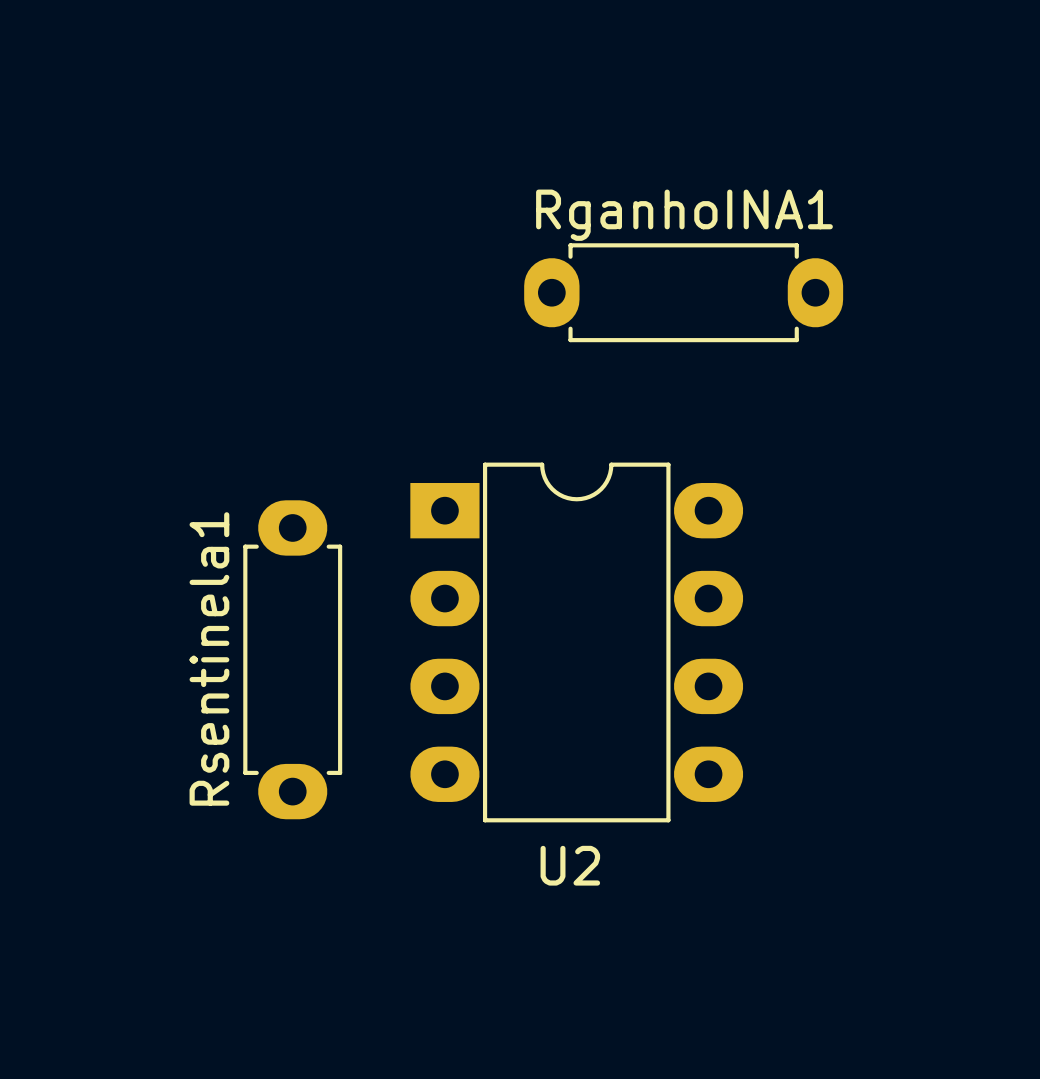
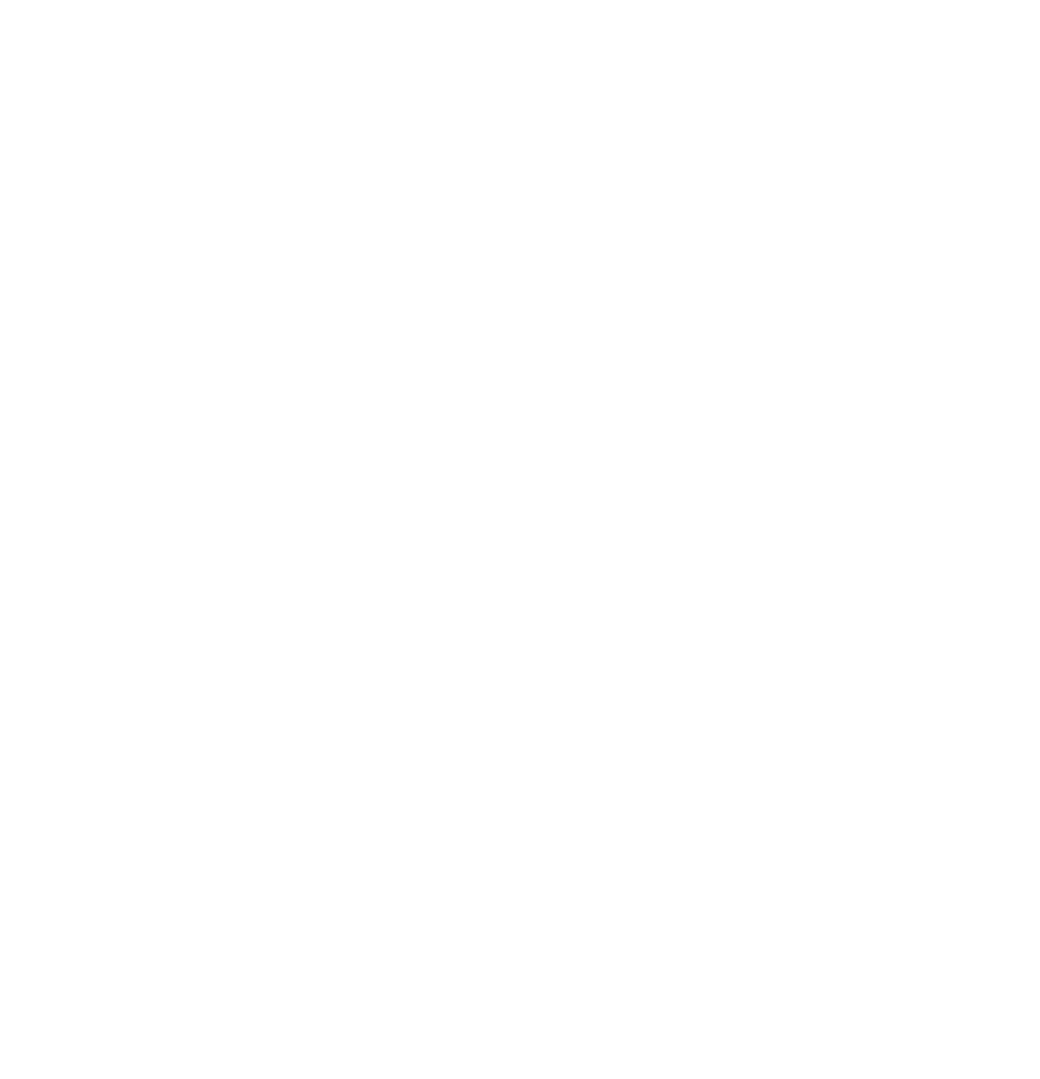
RganhoINA1: (683, 292) -> none
U2: (576, 642) -> none
Rsentinela1: (292, 659) -> none

